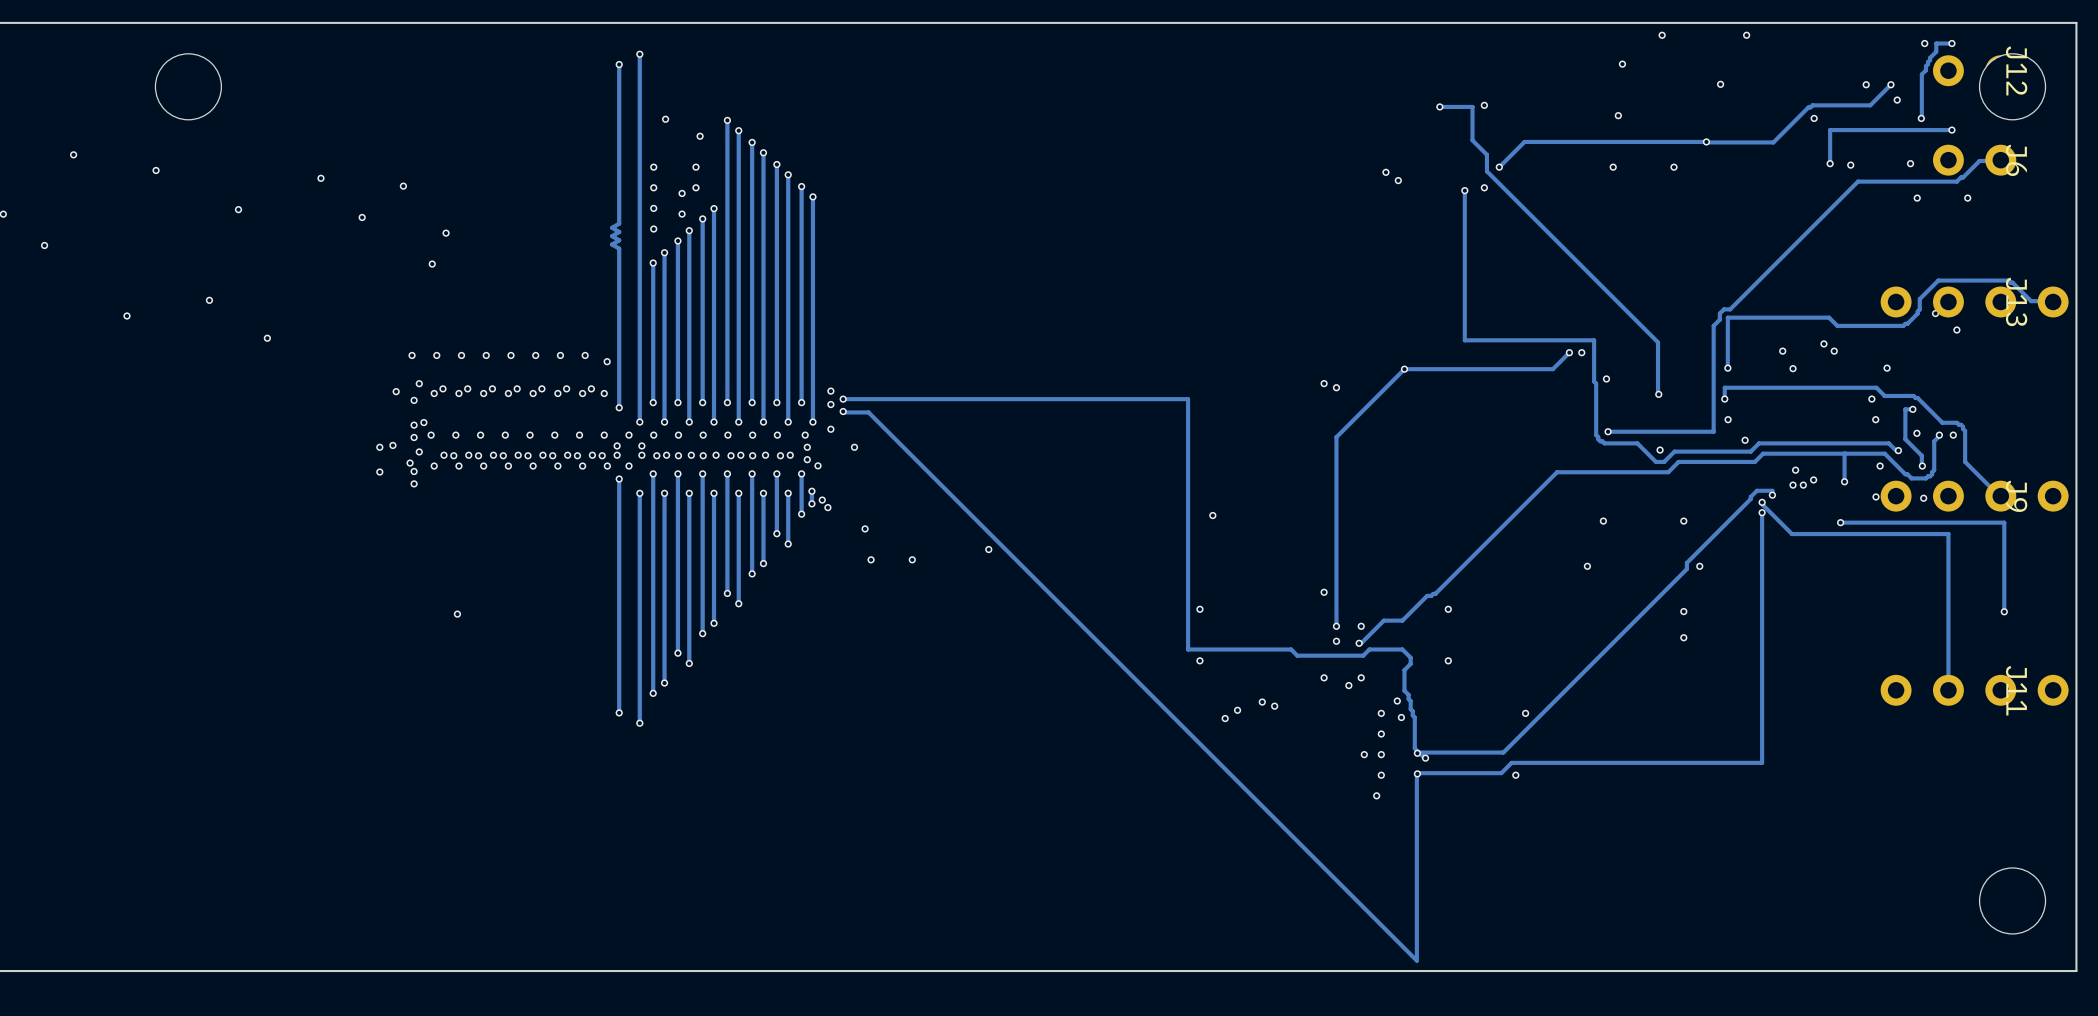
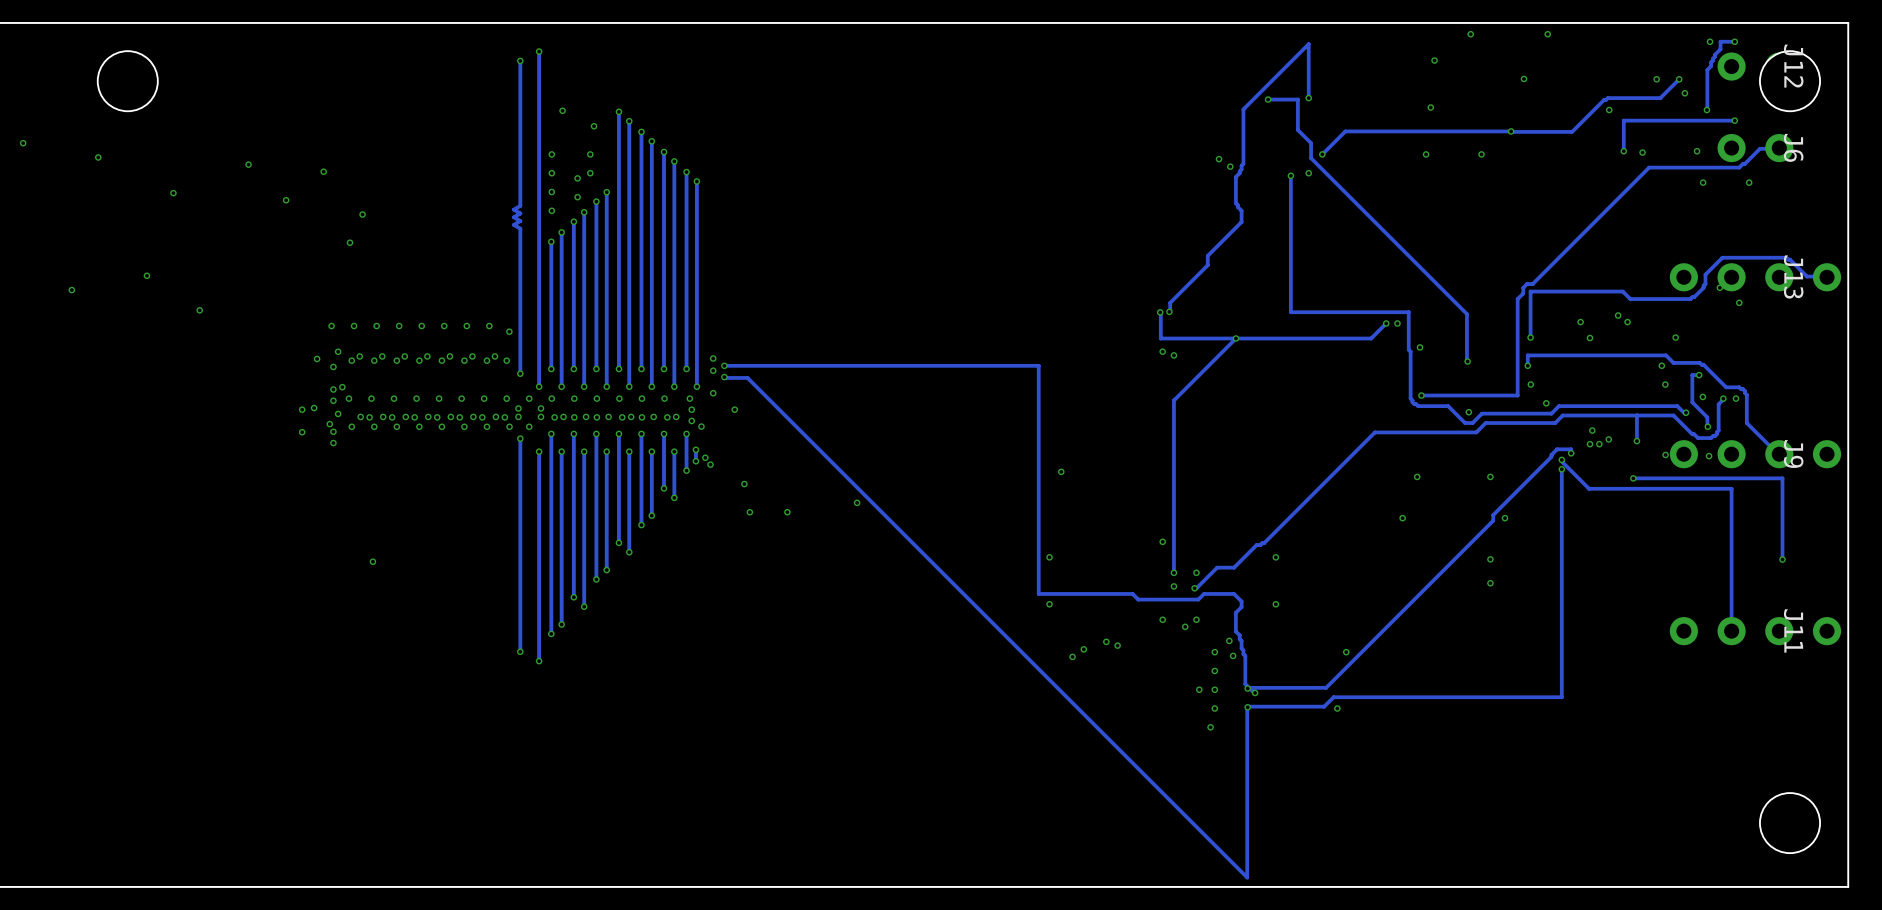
track: none -> (1308, 98) (1308, 44) (1243, 109) (1243, 163) (1235, 176) (1235, 203) (1241, 210) (1241, 222) (1207, 255) (1207, 265) (1170, 302) (1170, 312)
via: none -> (1169, 311)
via: none -> (1160, 312)
track: none -> (1160, 312) (1160, 338) (1235, 338)
via: (1880, 466) -> none

